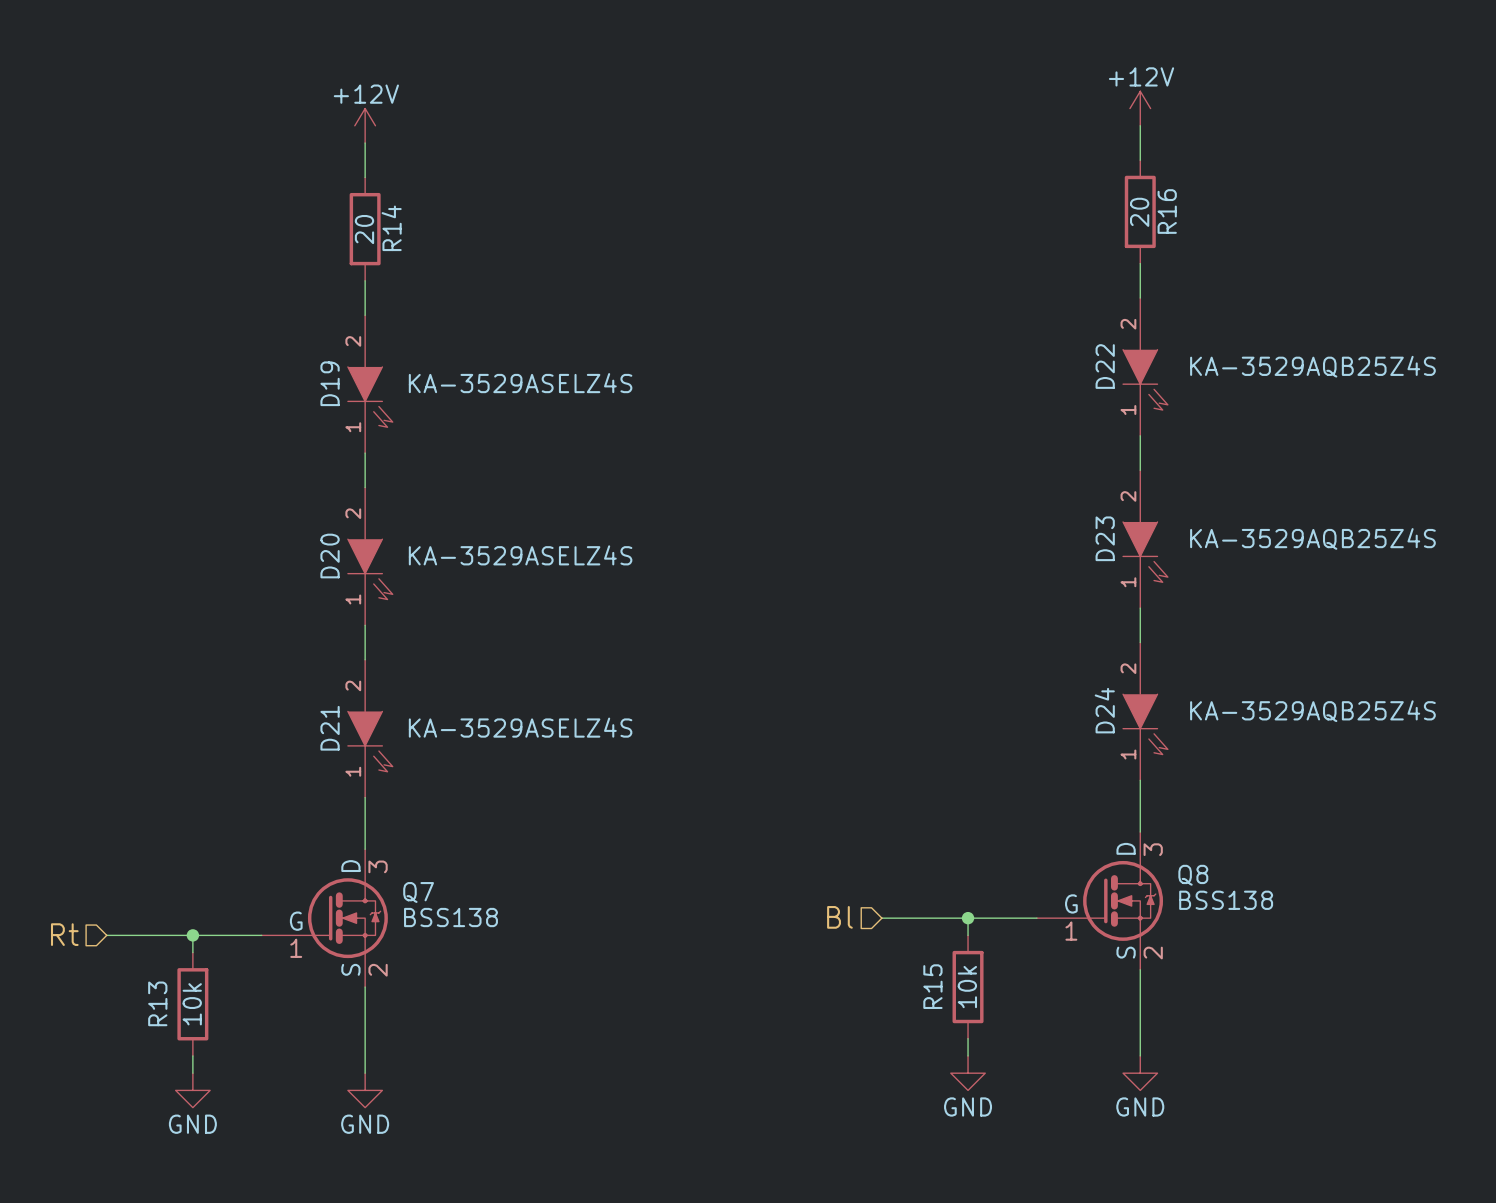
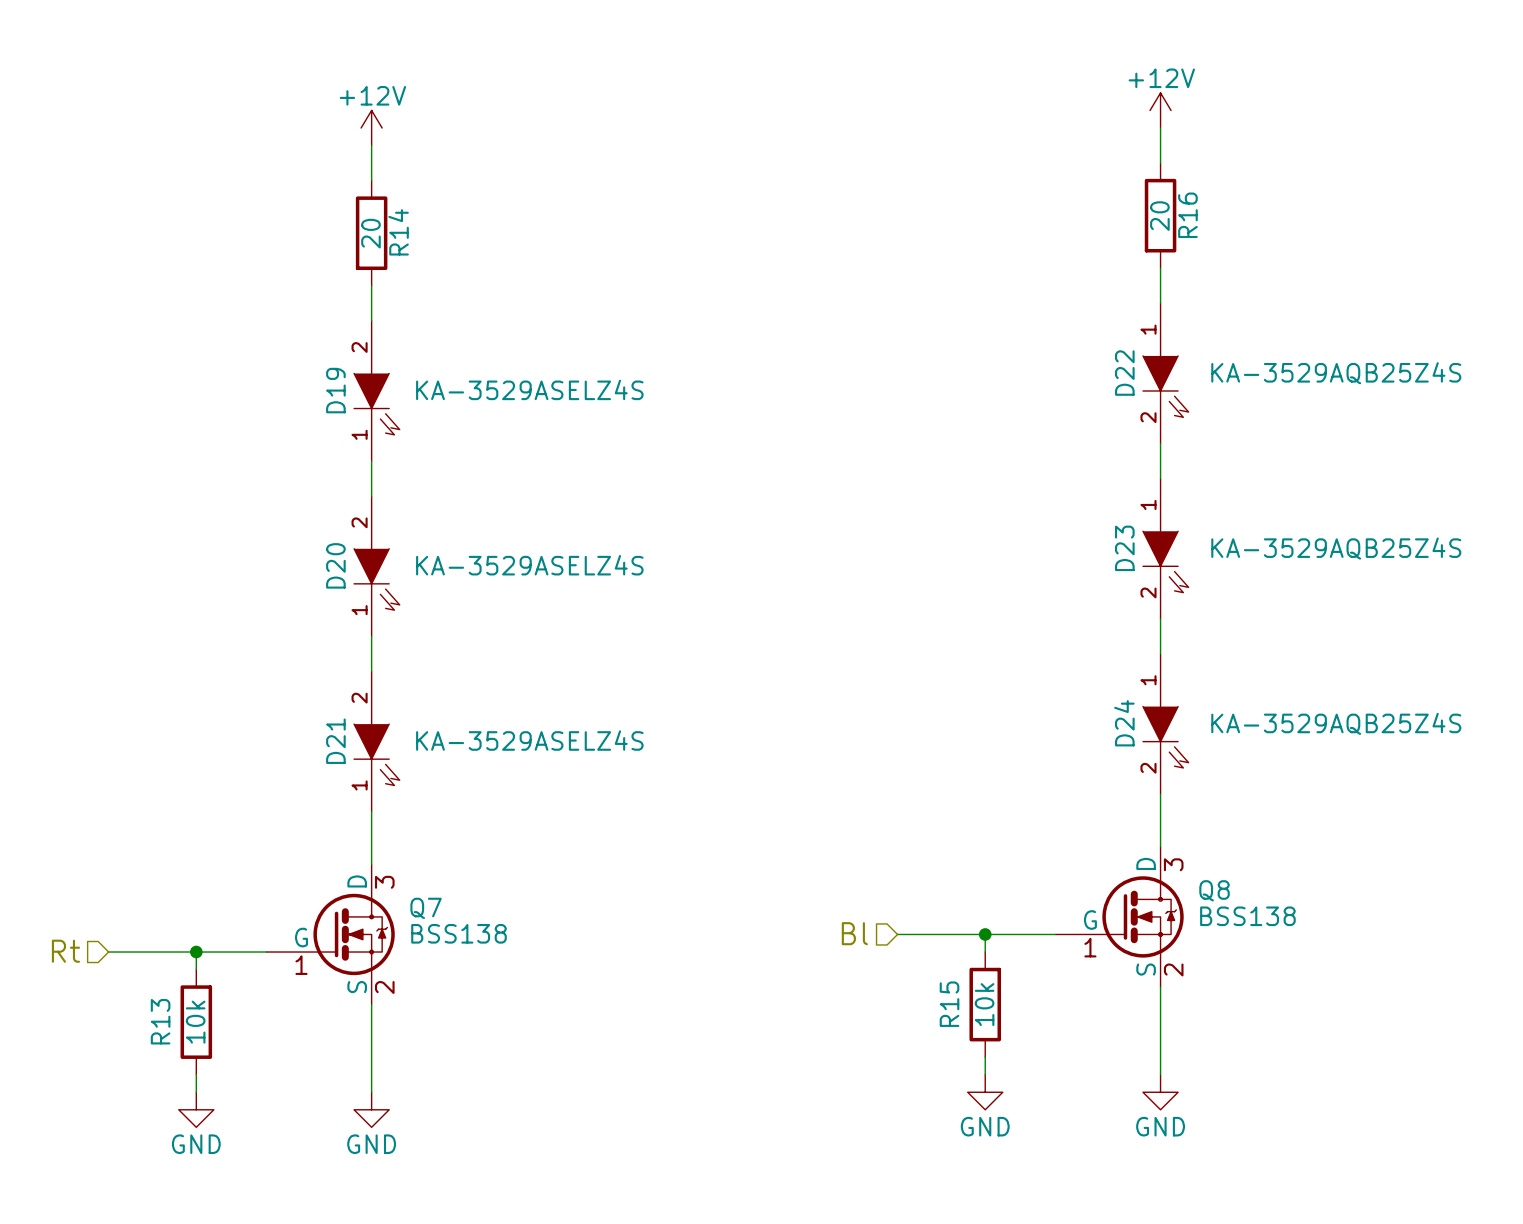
D22 pin number: 2 (1128, 324) -> 1 (1148, 329)
D22 pin number: 1 (1128, 410) -> 2 (1148, 417)
D23 pin number: 2 (1128, 496) -> 1 (1148, 504)
D23 pin number: 1 (1128, 582) -> 2 (1148, 592)
D24 pin number: 2 (1128, 668) -> 1 (1148, 680)
D24 pin number: 1 (1128, 754) -> 2 (1148, 768)

